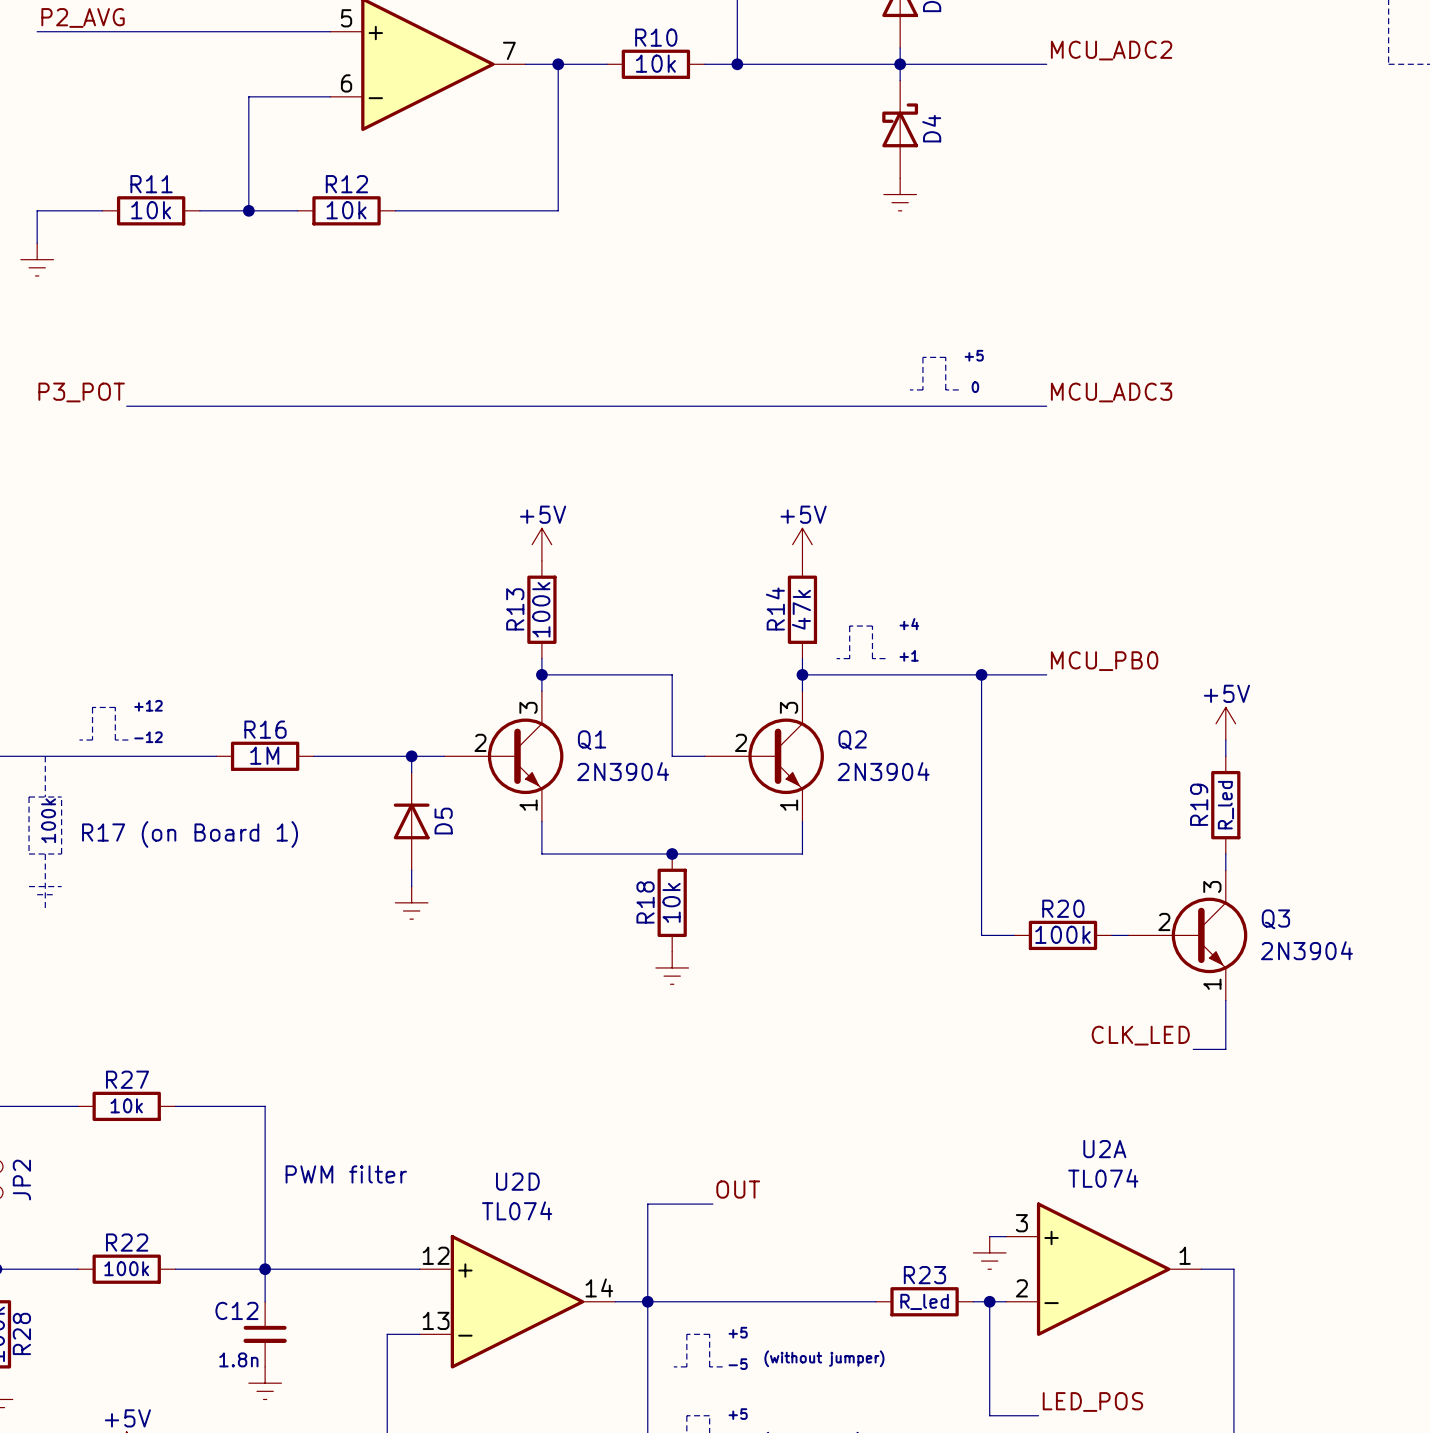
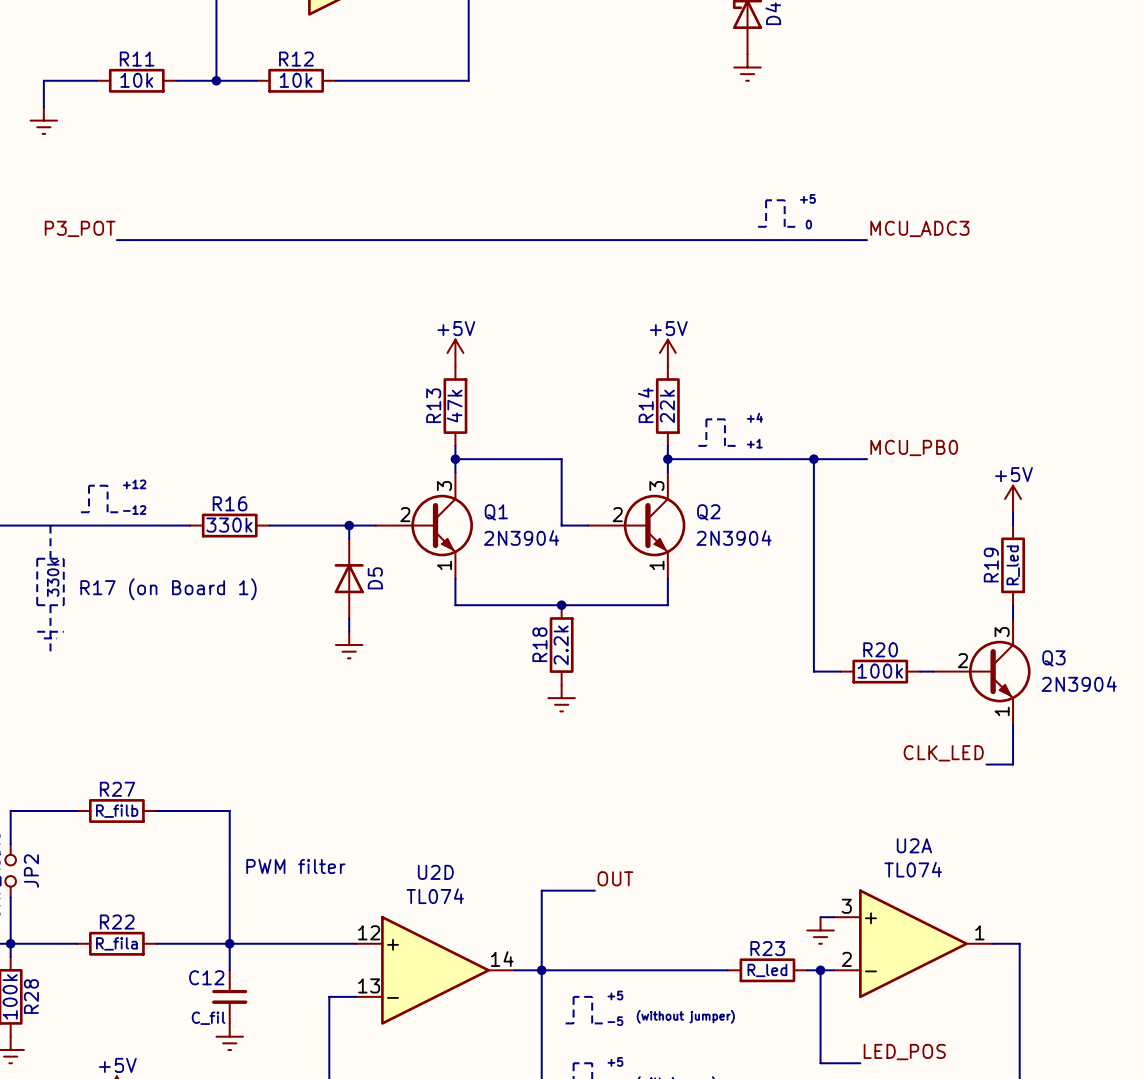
R13 value: 100k (541, 609) -> 47k (454, 406)
R14 value: 47k (801, 609) -> 22k (667, 406)
R16 value: 1M (264, 755) -> 330k (229, 525)
text: 100k (48, 820) -> 330k (53, 578)
R18 value: 10k (671, 902) -> 2.2k (561, 645)
R27 value: 10k (126, 1105) -> R_filb (117, 811)
R22 value: 100k (126, 1268) -> R_fila (116, 943)
C12 value: 1.8n (238, 1359) -> C_fil (208, 1018)

